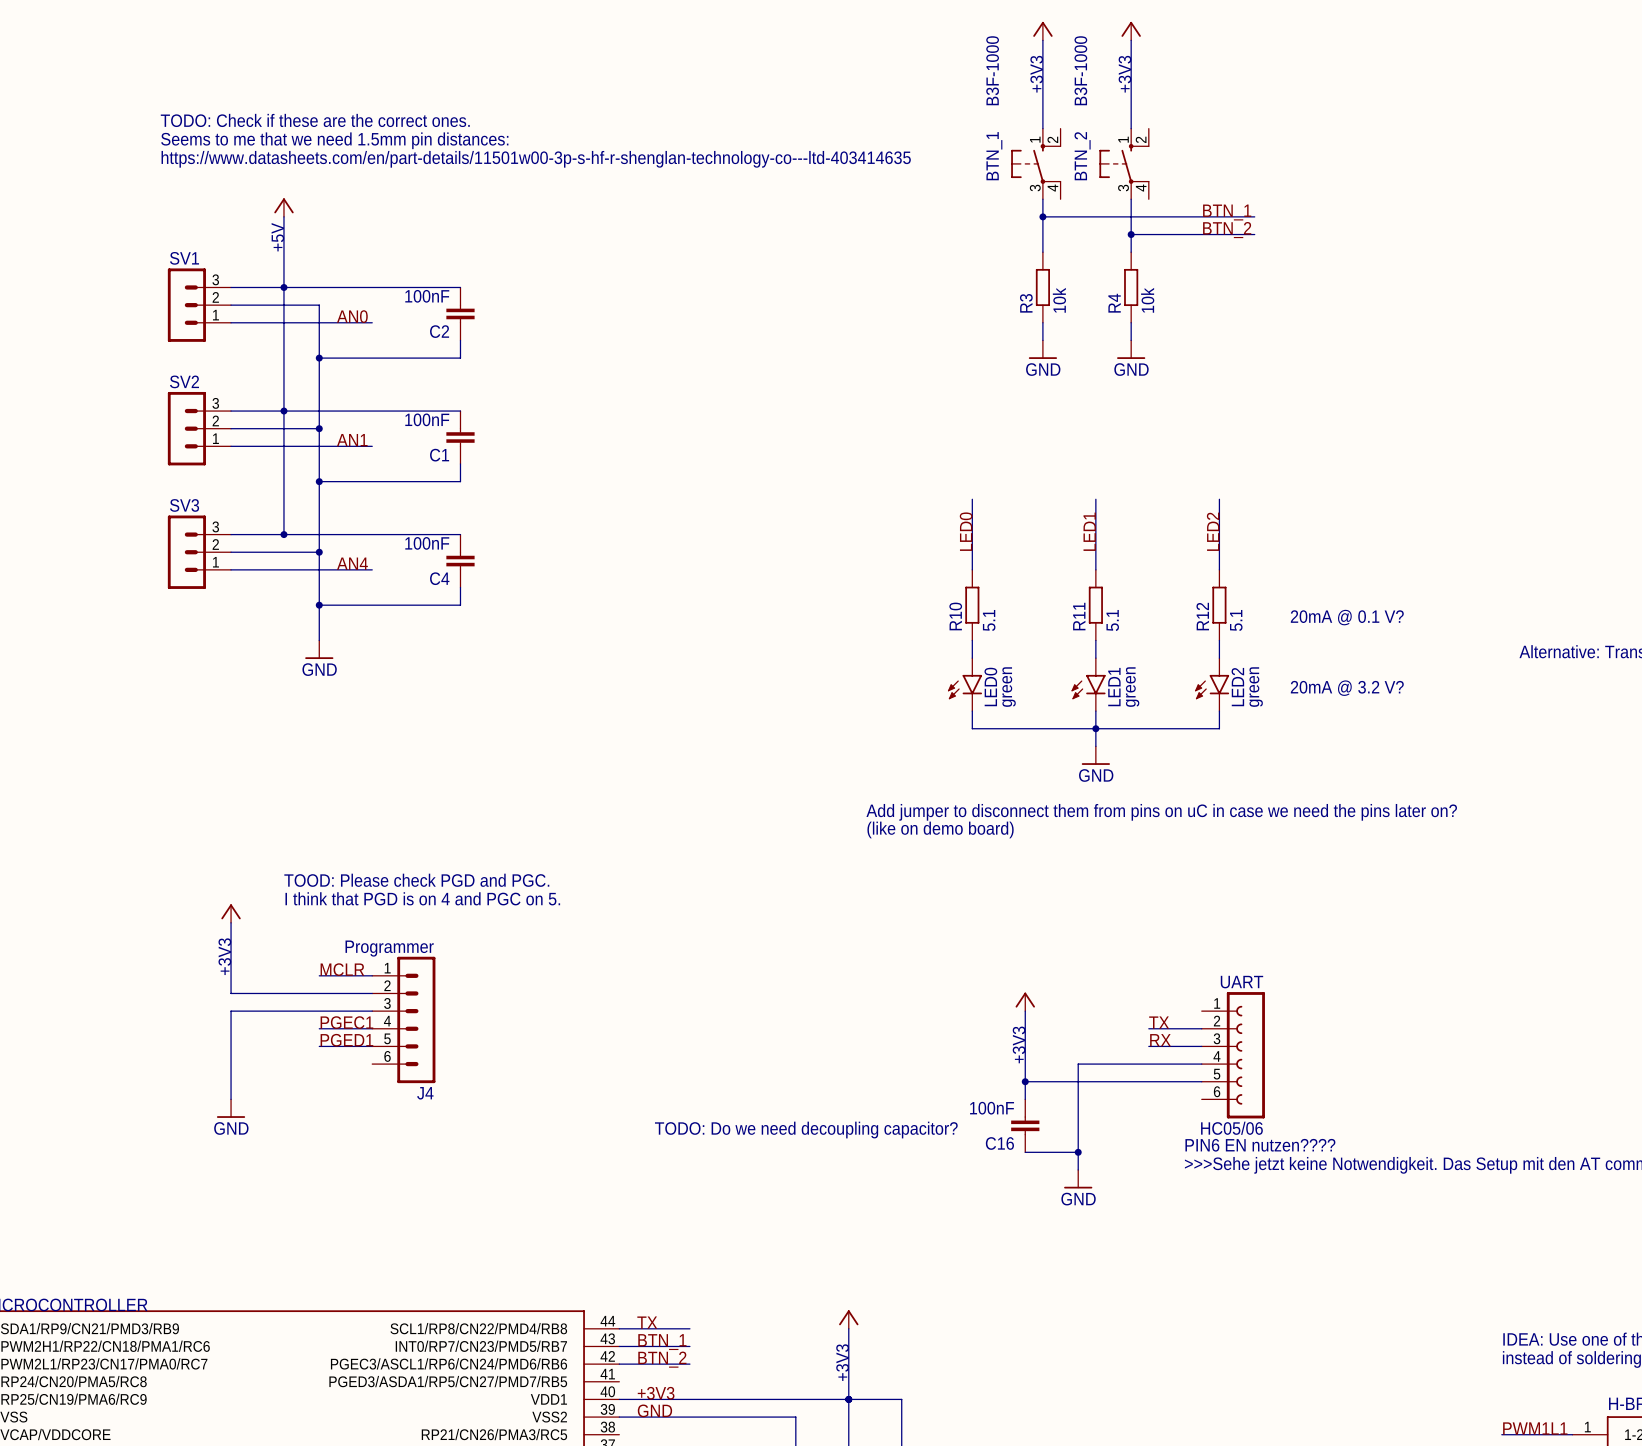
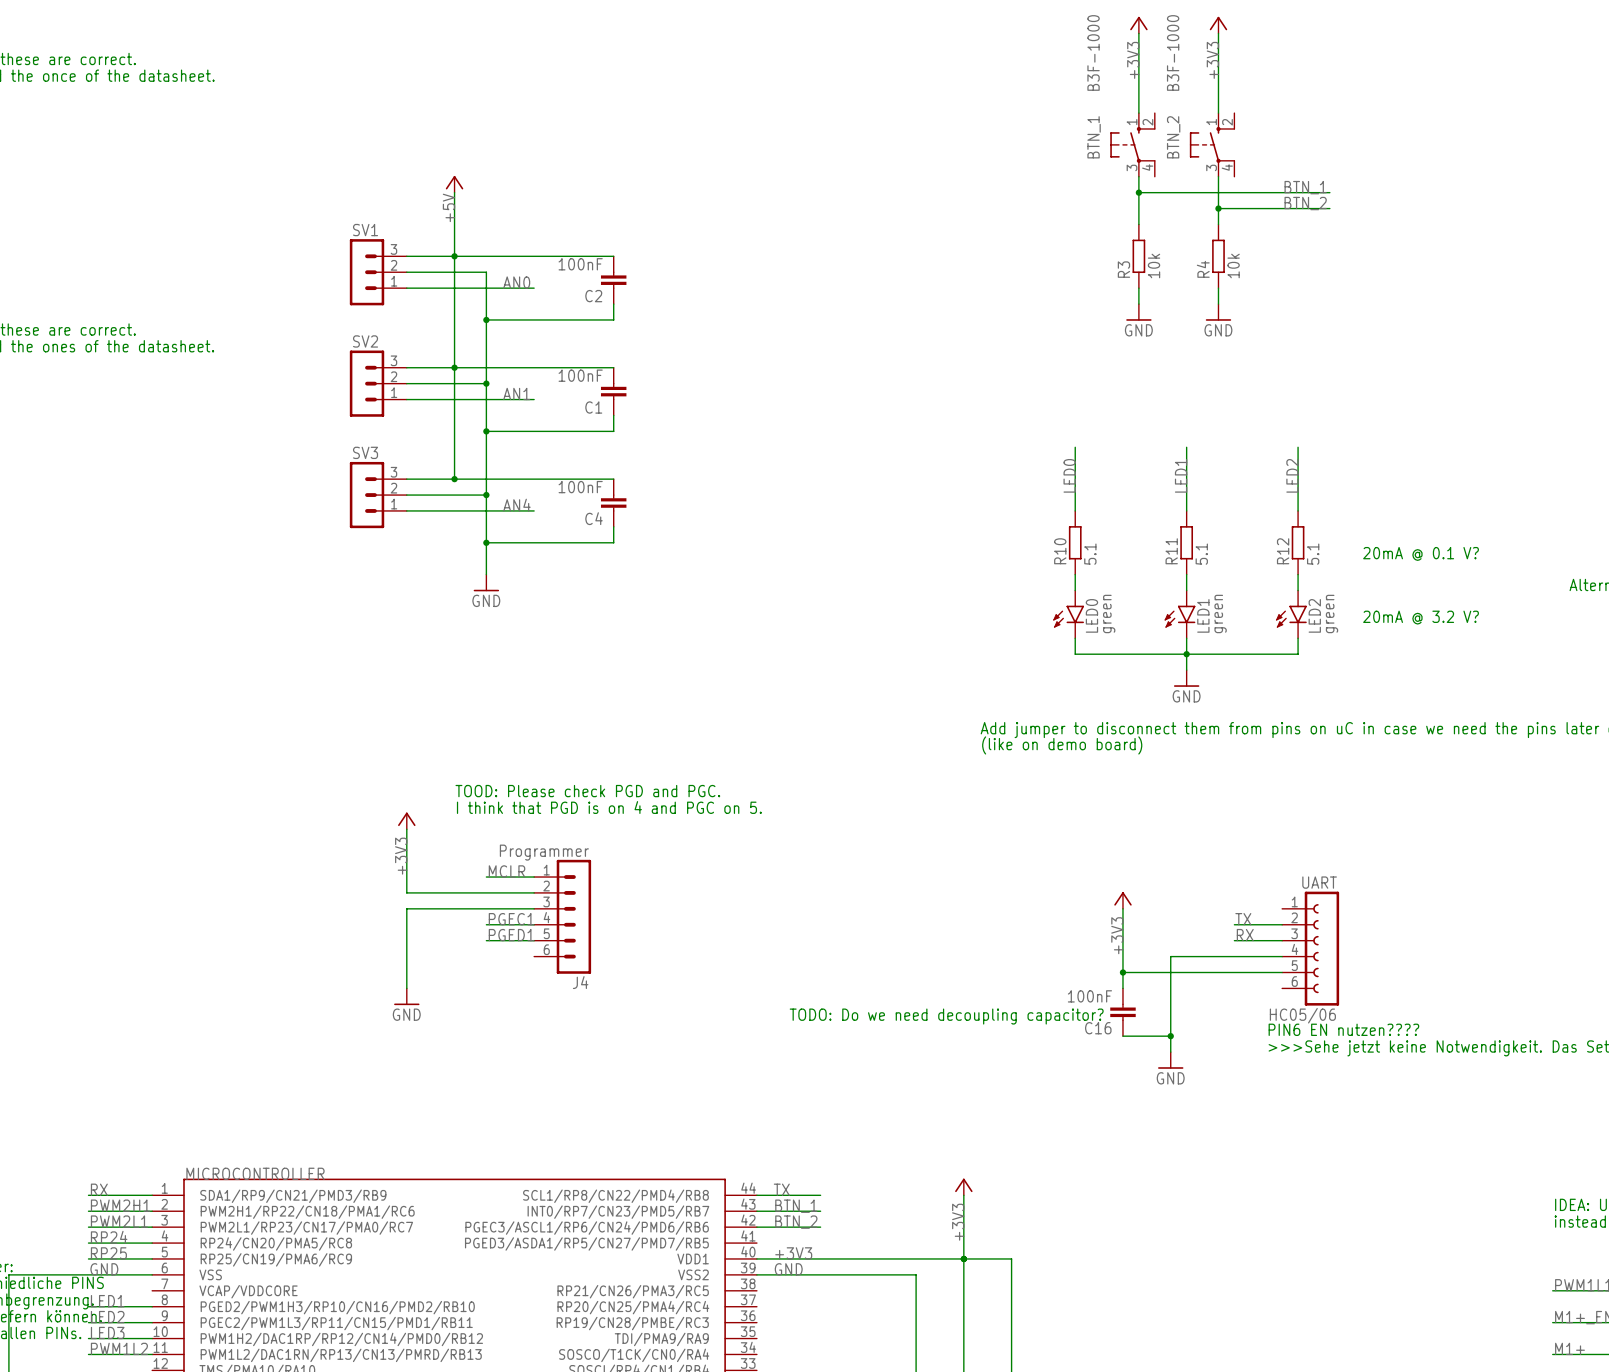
text: TODO: Check if these are the correct ones. (315, 120) -> none
text: Seems to me that we need 1.5mm pin distances: (334, 140) -> none
text: https://www.datasheets.com/en/part-details/11501w00-3p-s-hf-r-shenglan-technology-co---ltd-403414635 (536, 159) -> none

